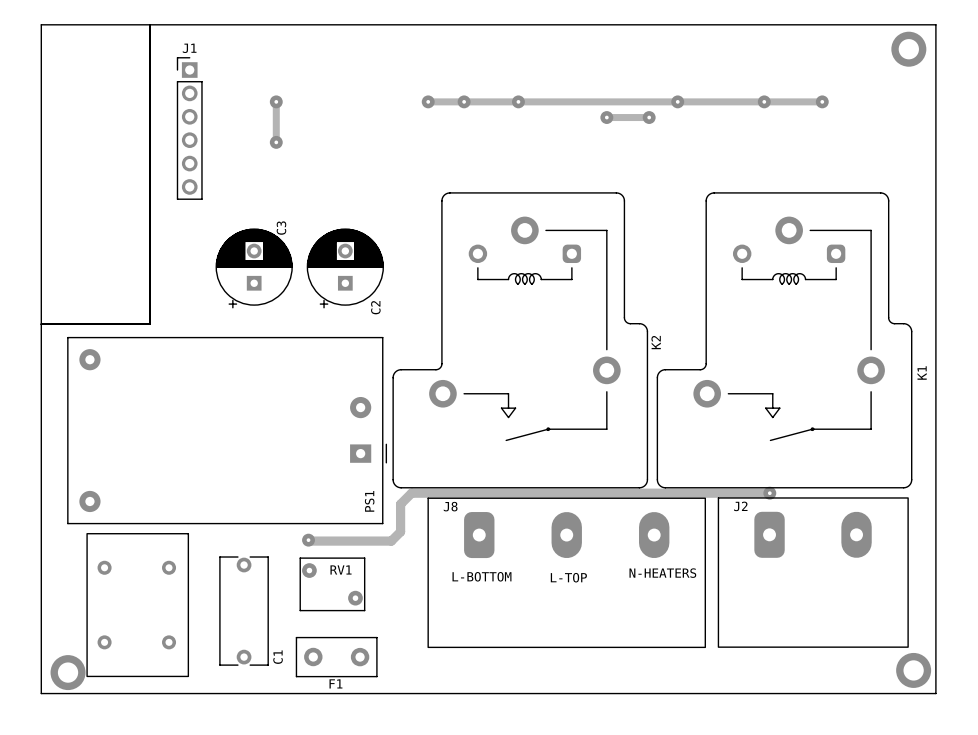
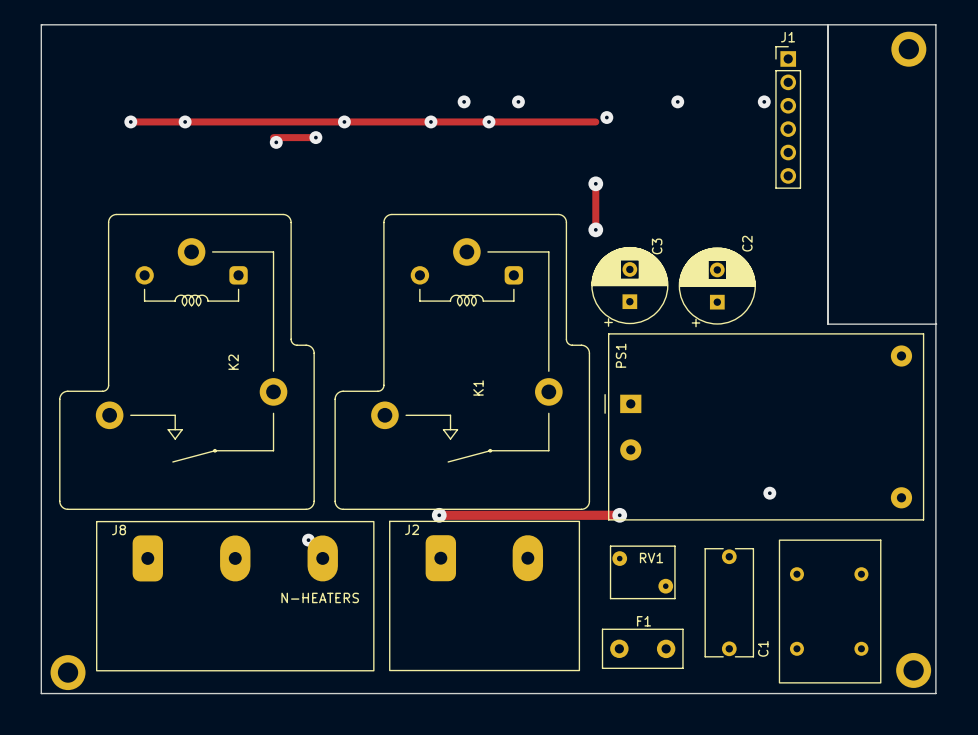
board edge: (149, 24) (149, 324) (41, 324) -> none
board edge: none -> (828, 24) (828, 324) (936, 324)
track: (276, 101) (276, 142) -> none
via: (276, 101) -> none
track: (428, 101) (822, 101) -> none
via position: (428, 101) -> (430, 121)
via: (822, 101) -> none
track: (606, 117) (649, 117) -> none
via: (649, 117) -> none
track: none -> (130, 121) (595, 121)
via: none -> (130, 121)
via: none -> (185, 121)
via: none -> (344, 121)
via: none -> (488, 121)
J1 position: (189, 128) -> (788, 117)
track: none -> (273, 137) (315, 137)
via: none -> (315, 137)
track: none -> (595, 183) (595, 229)
via: none -> (595, 183)
via: none -> (595, 229)
C3 position: (254, 268) -> (629, 286)
C2 position: (345, 268) -> (717, 287)
C2 name position: C2 (375, 307) -> C2 (747, 243)
K2 position: (520, 340) -> (186, 361)
K1 position: (784, 340) -> (462, 361)
K2 name position: K2 (656, 342) -> K2 (233, 362)
K1 name position: K1 (922, 373) -> K1 (478, 388)
PS1 rotation: 0° (227, 430) -> 180° (764, 426)
PS1 position: (227, 430) -> (764, 426)
track: (769, 493) (411, 493) (400, 504) (400, 531) (391, 541) (308, 540) -> none
track: none -> (439, 515) (619, 515)
via: none -> (439, 515)
via: none -> (619, 515)
J8 position: (566, 572) -> (235, 596)
J2 position: (813, 572) -> (484, 595)
text: N-HEATERS (662, 573) -> none
text: L-BOTTOM (481, 576) -> none
text: L-TOP (568, 577) -> none
RV1 position: (332, 584) -> (642, 572)
text: none -> N-HEATERS (320, 597)
part: (137, 605) -> none
C1 position: (244, 611) -> (729, 602)
part: none -> (830, 611)
F1 position: (336, 657) -> (642, 648)
F1 name position: F1 (335, 683) -> F1 (643, 621)

